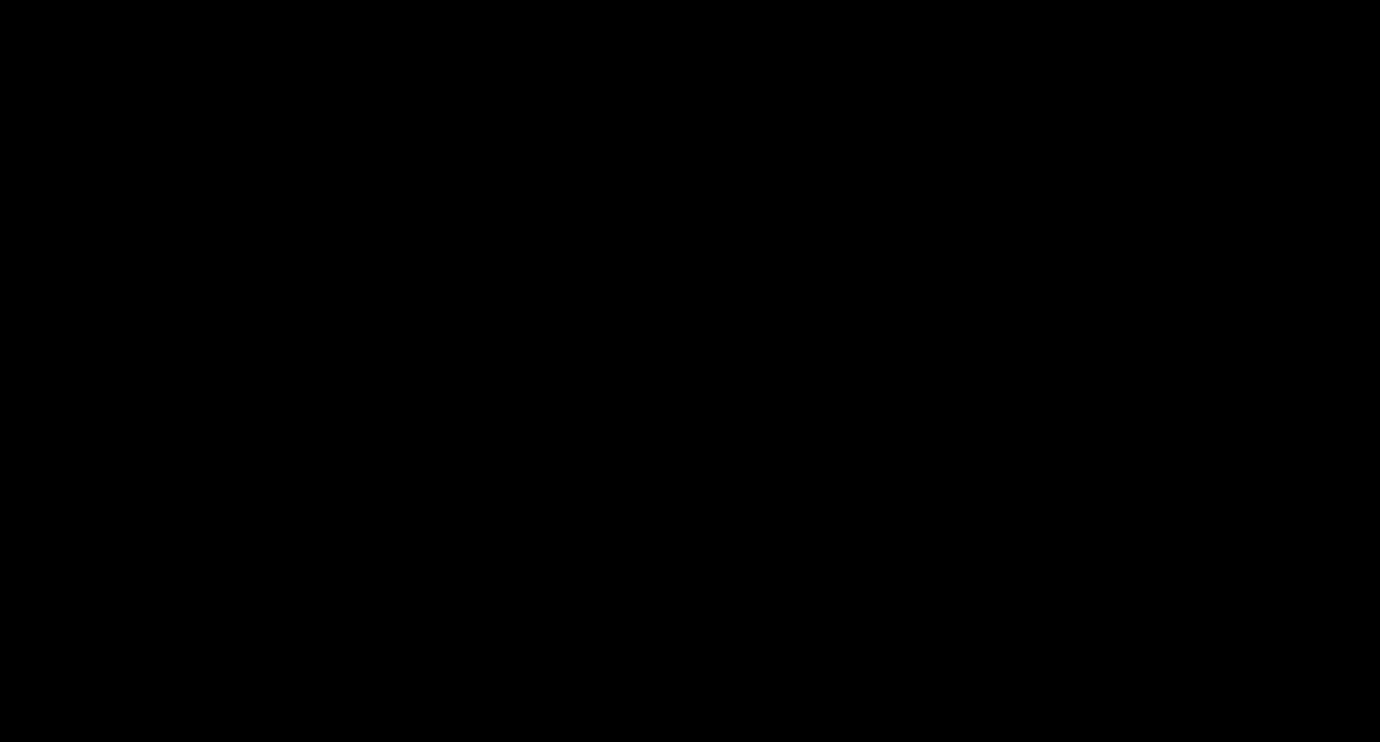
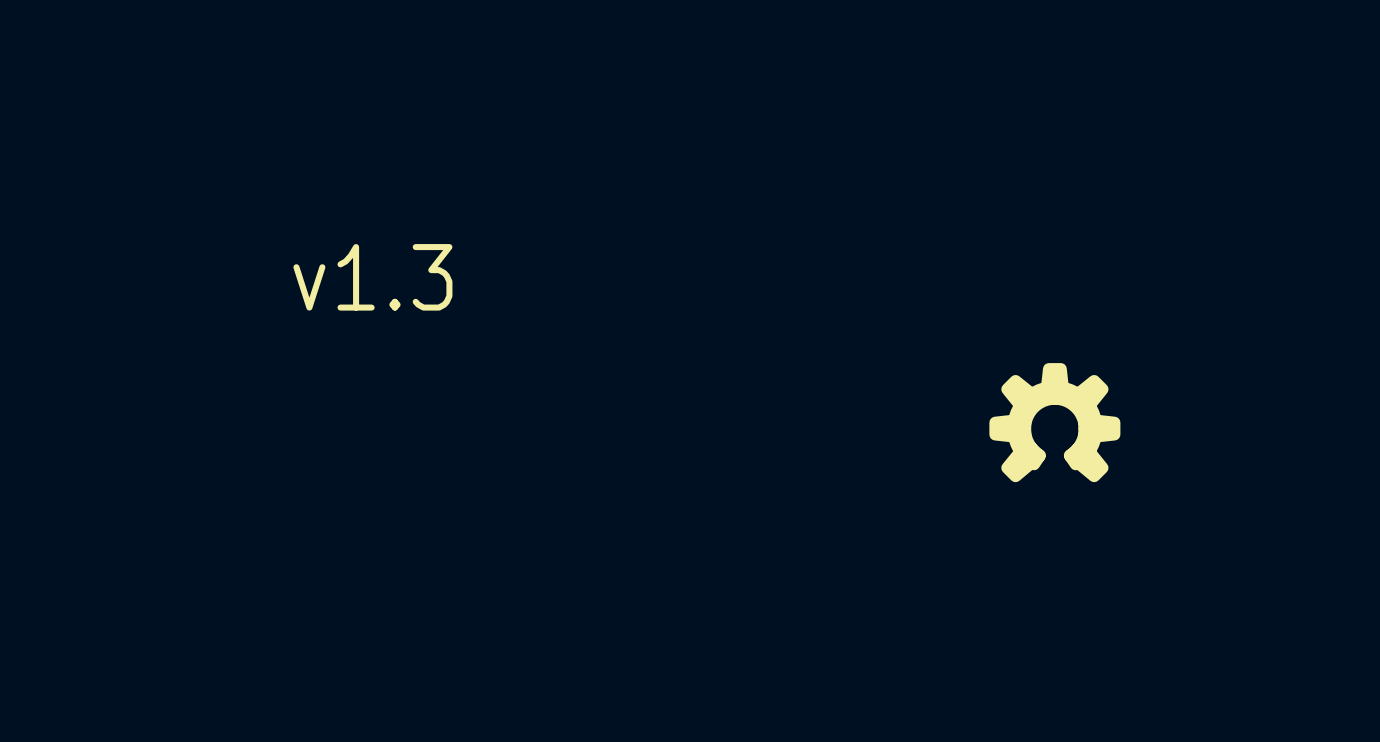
drawing: none -> [293, 244, 453, 311]
drawing: none -> [989, 363, 1121, 483]

